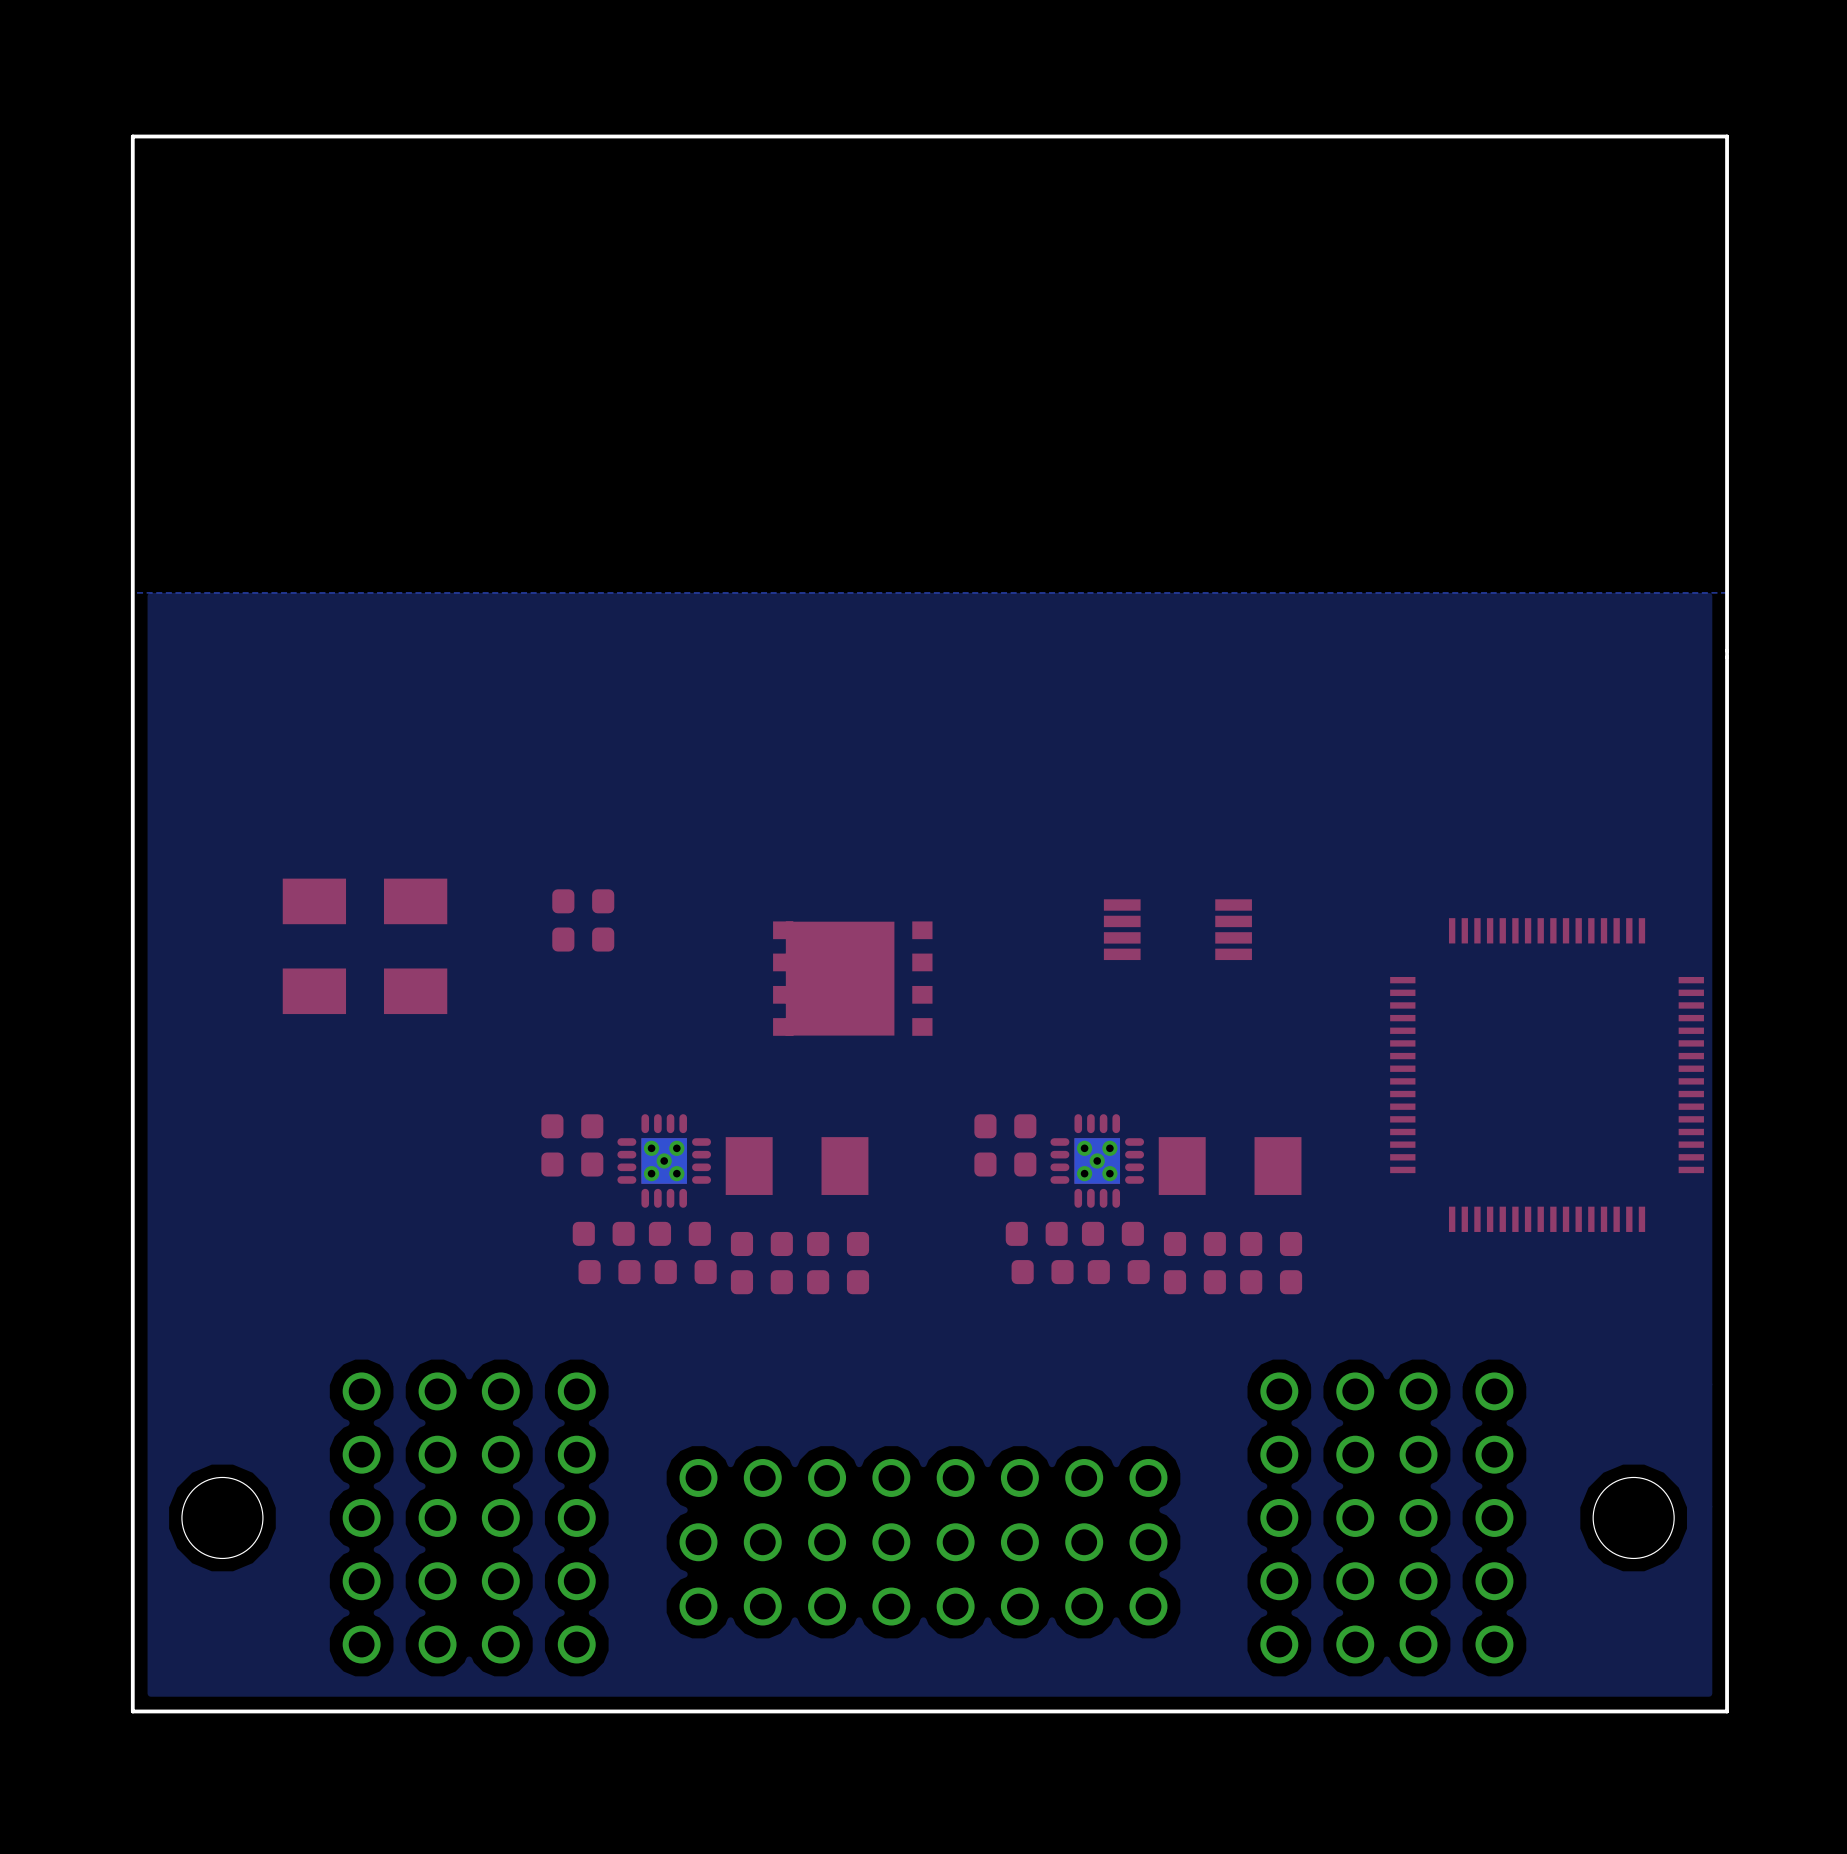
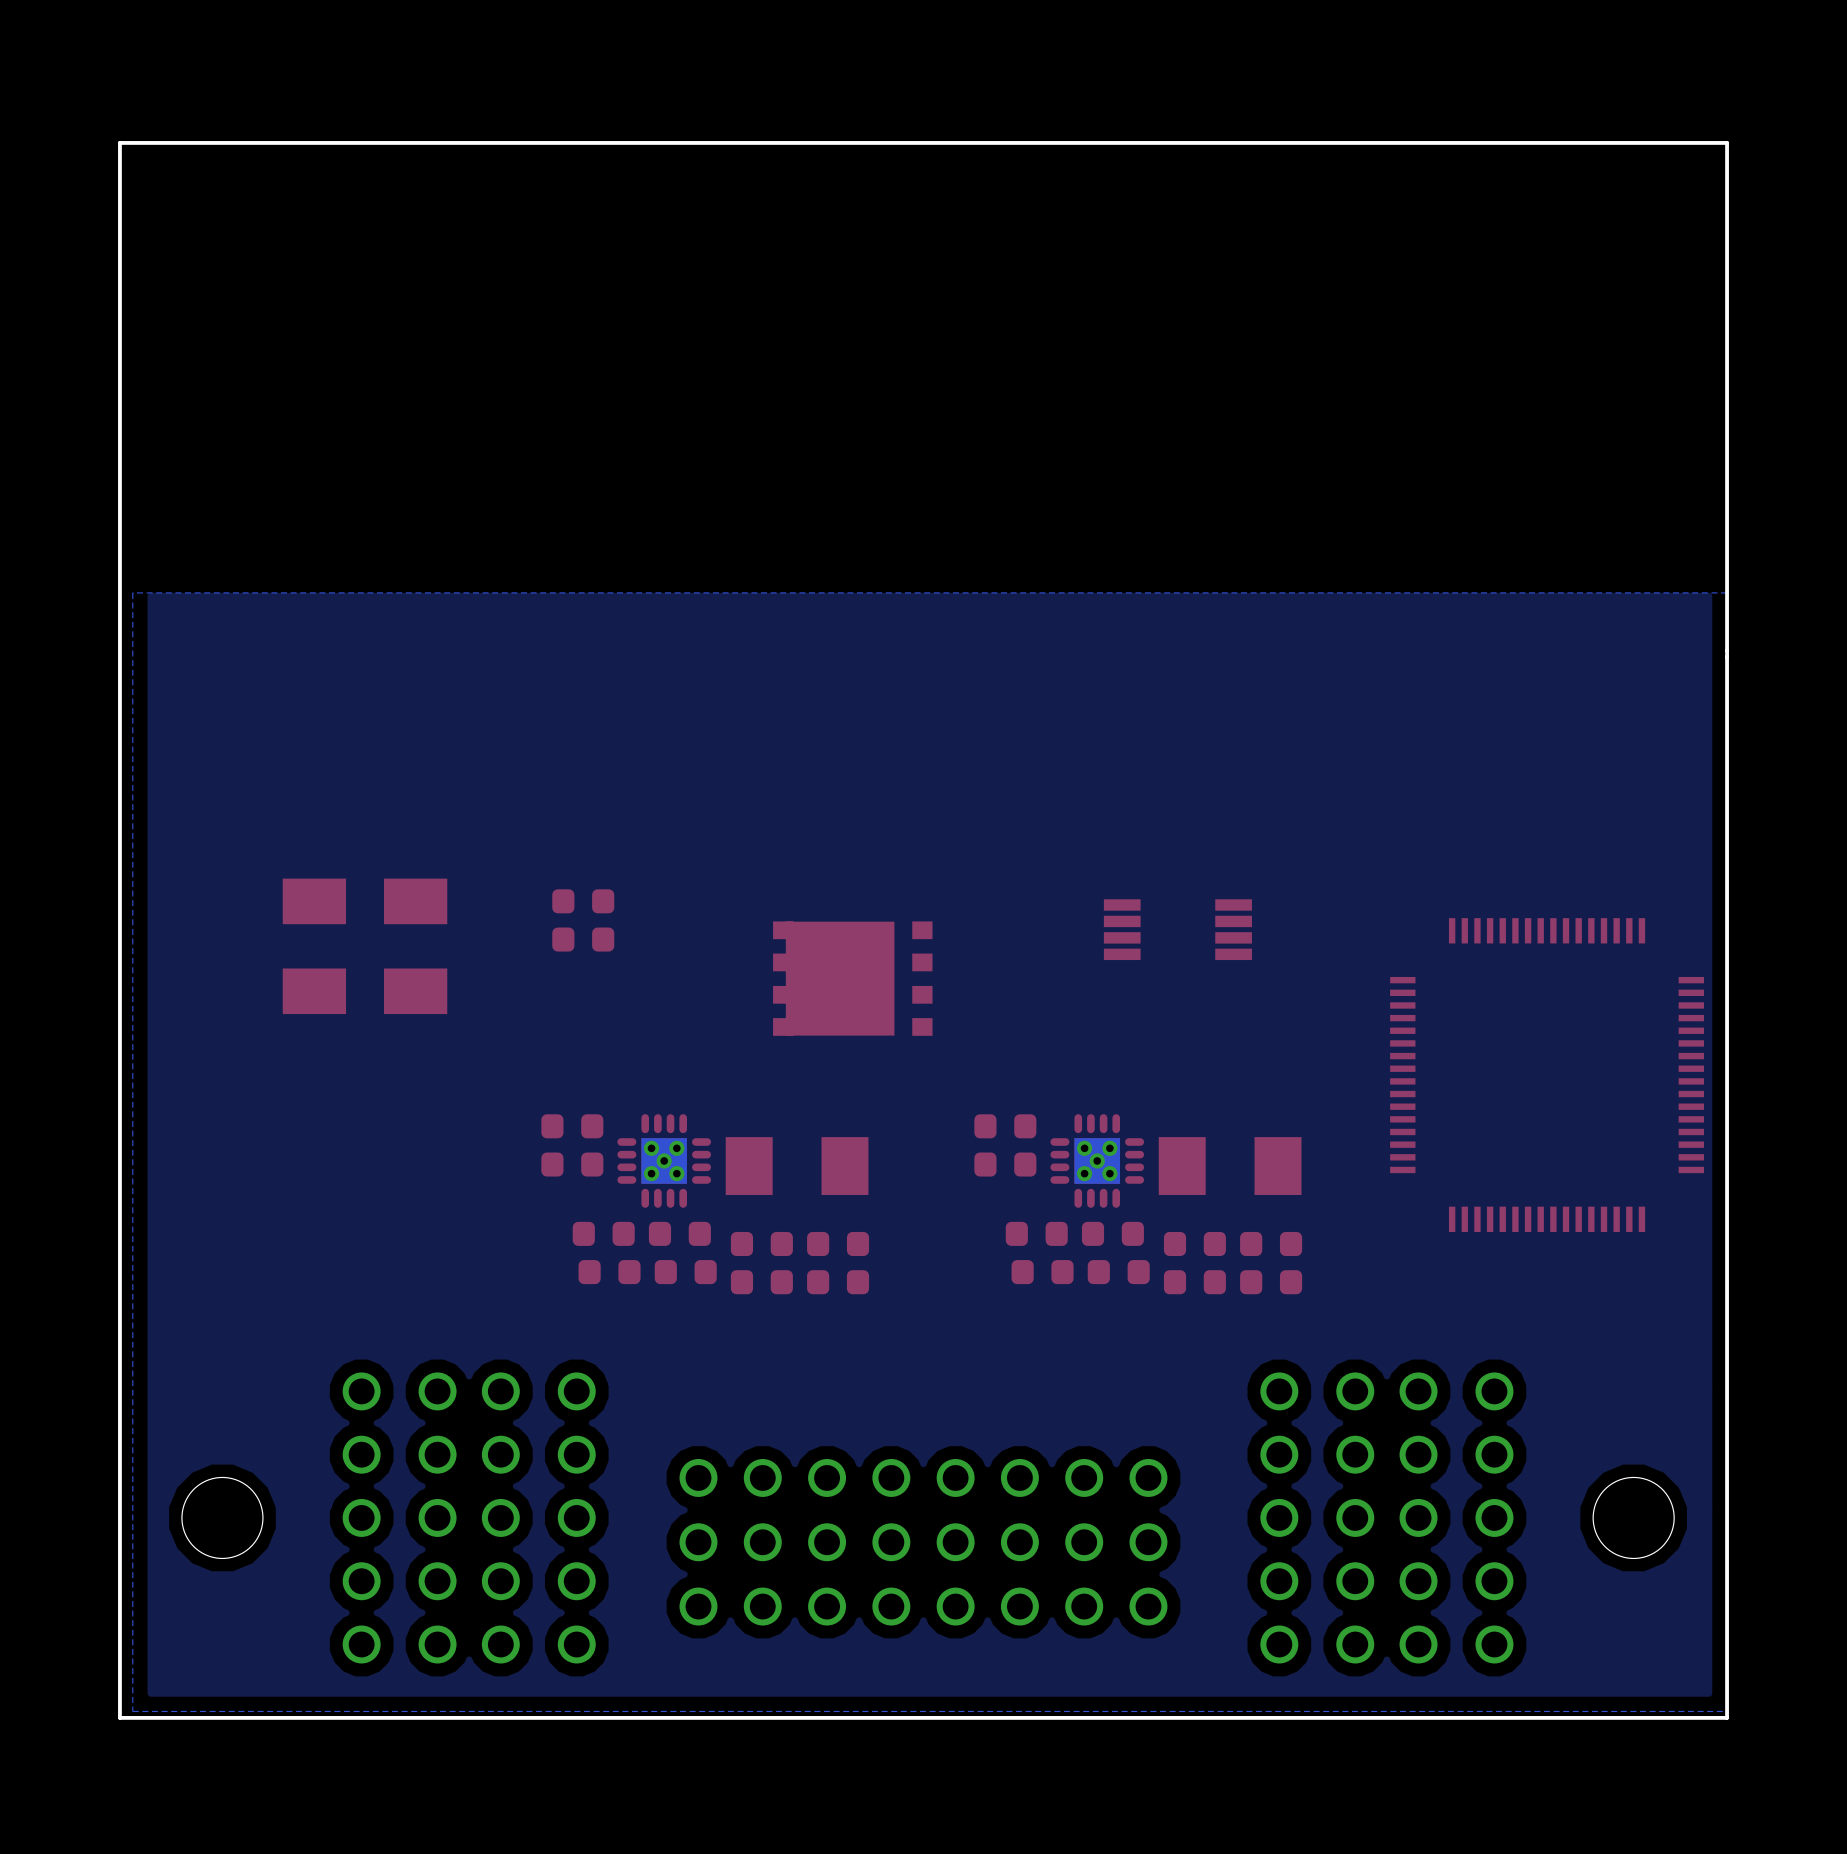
board edge: (1727, 142) (1727, 136) (132, 136) (132, 1711) (1727, 1711) -> (1727, 142) (119, 142) (119, 1717) (1727, 1717) (1727, 1711)

